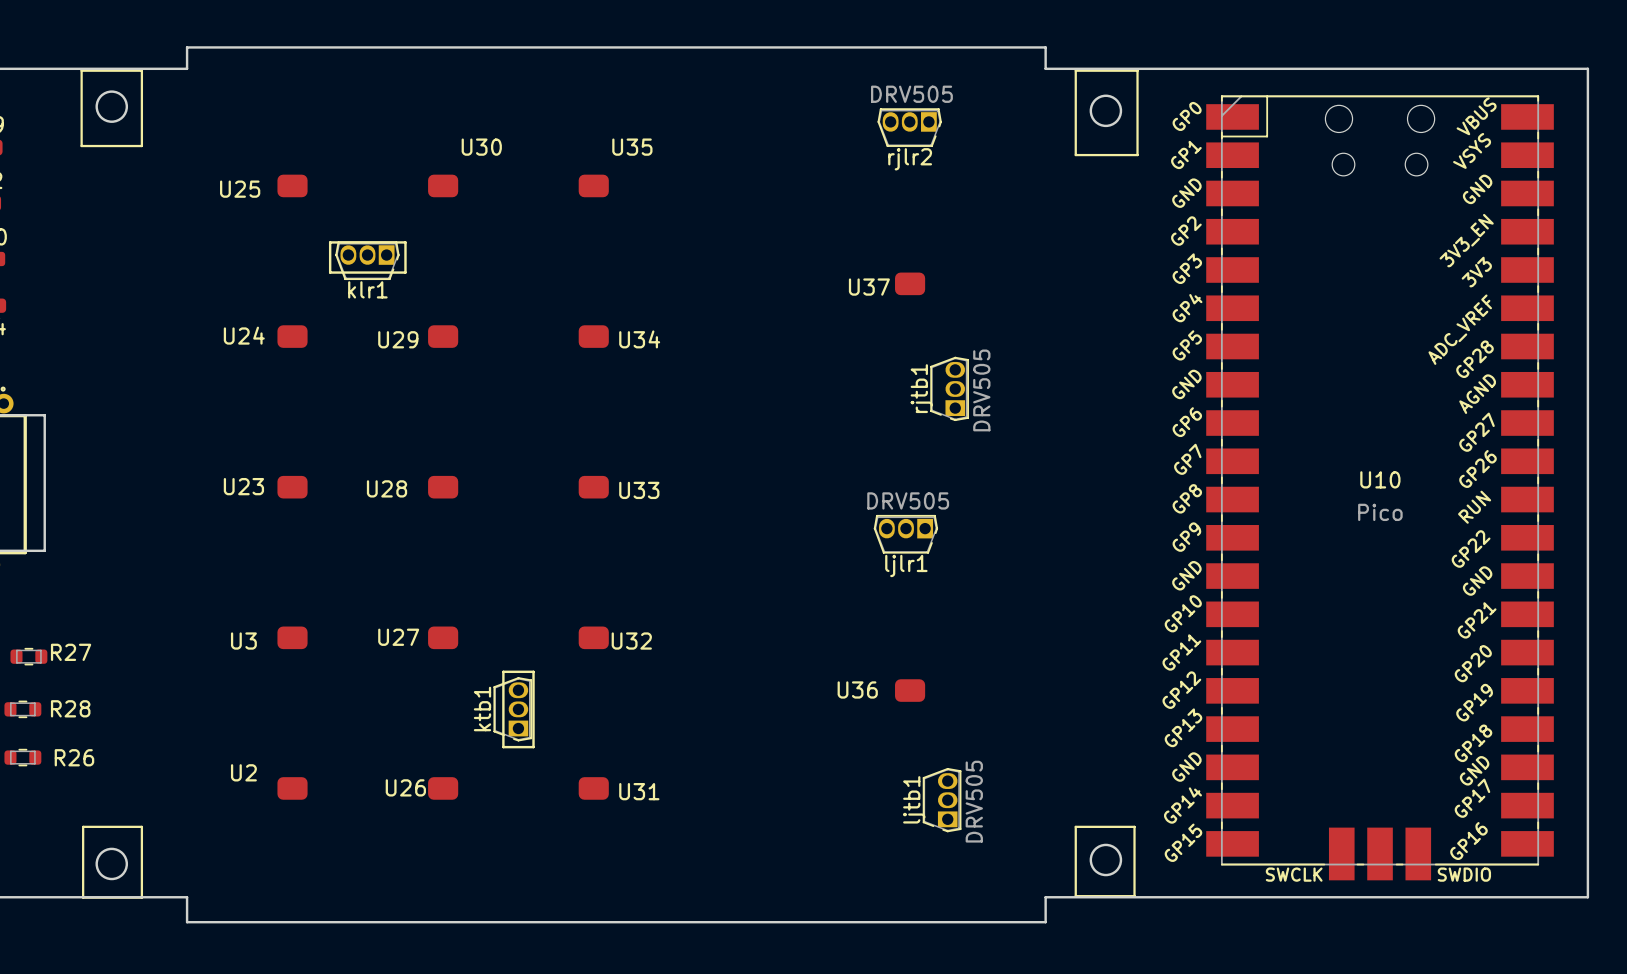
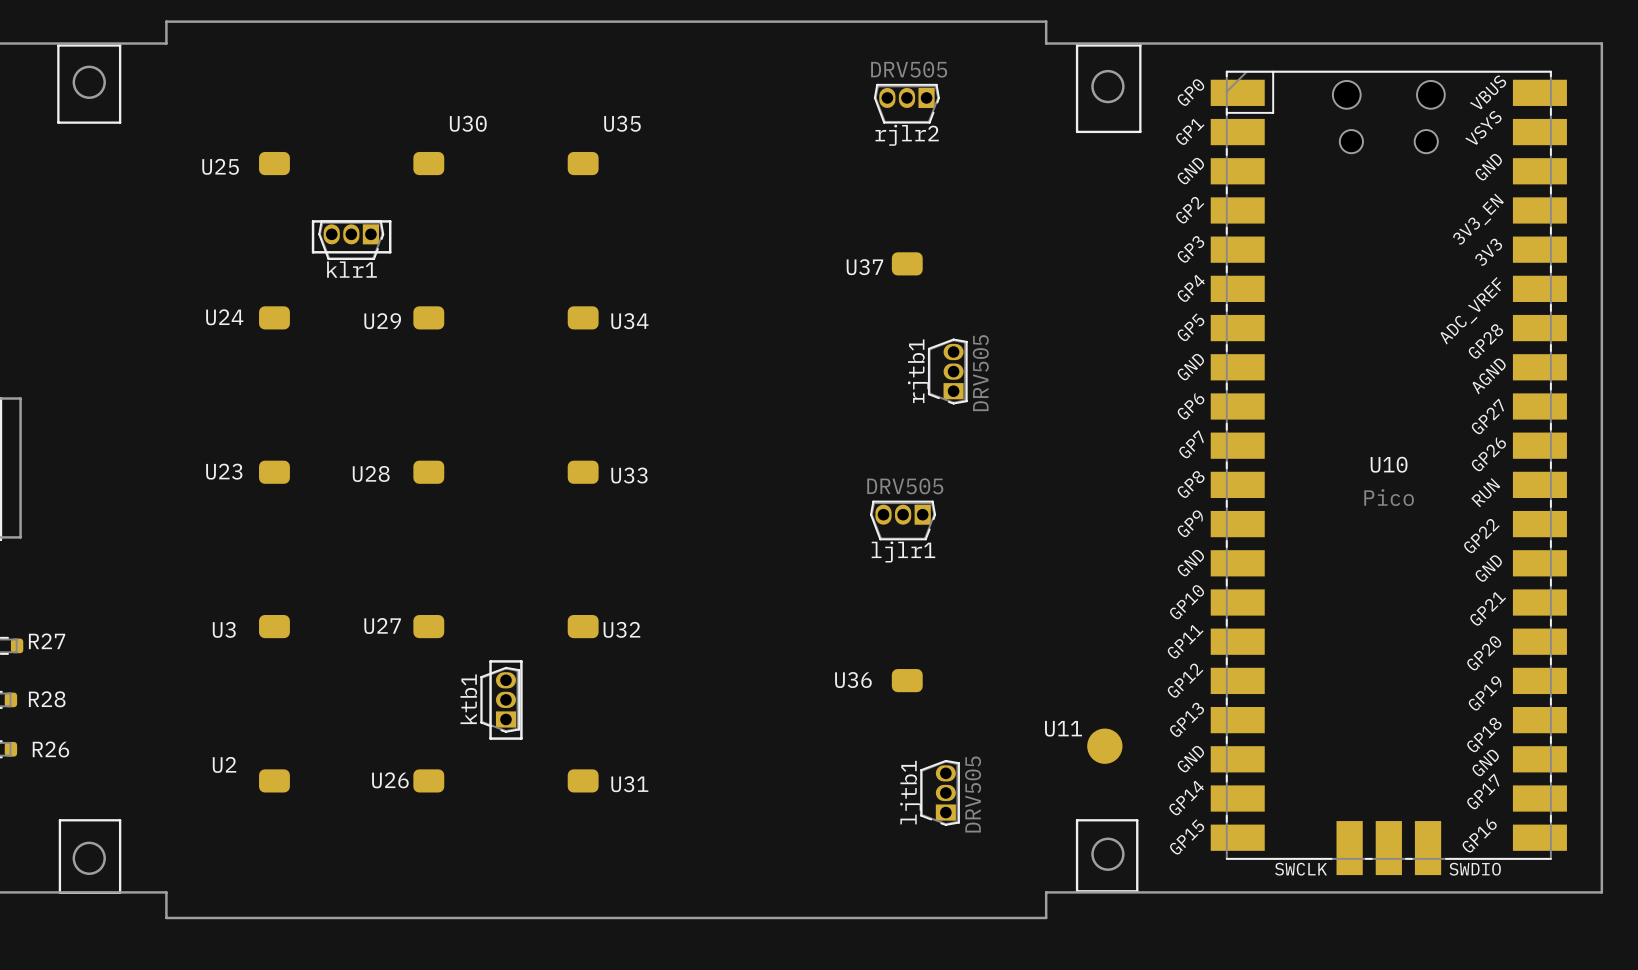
U11: none -> (1104, 746)

